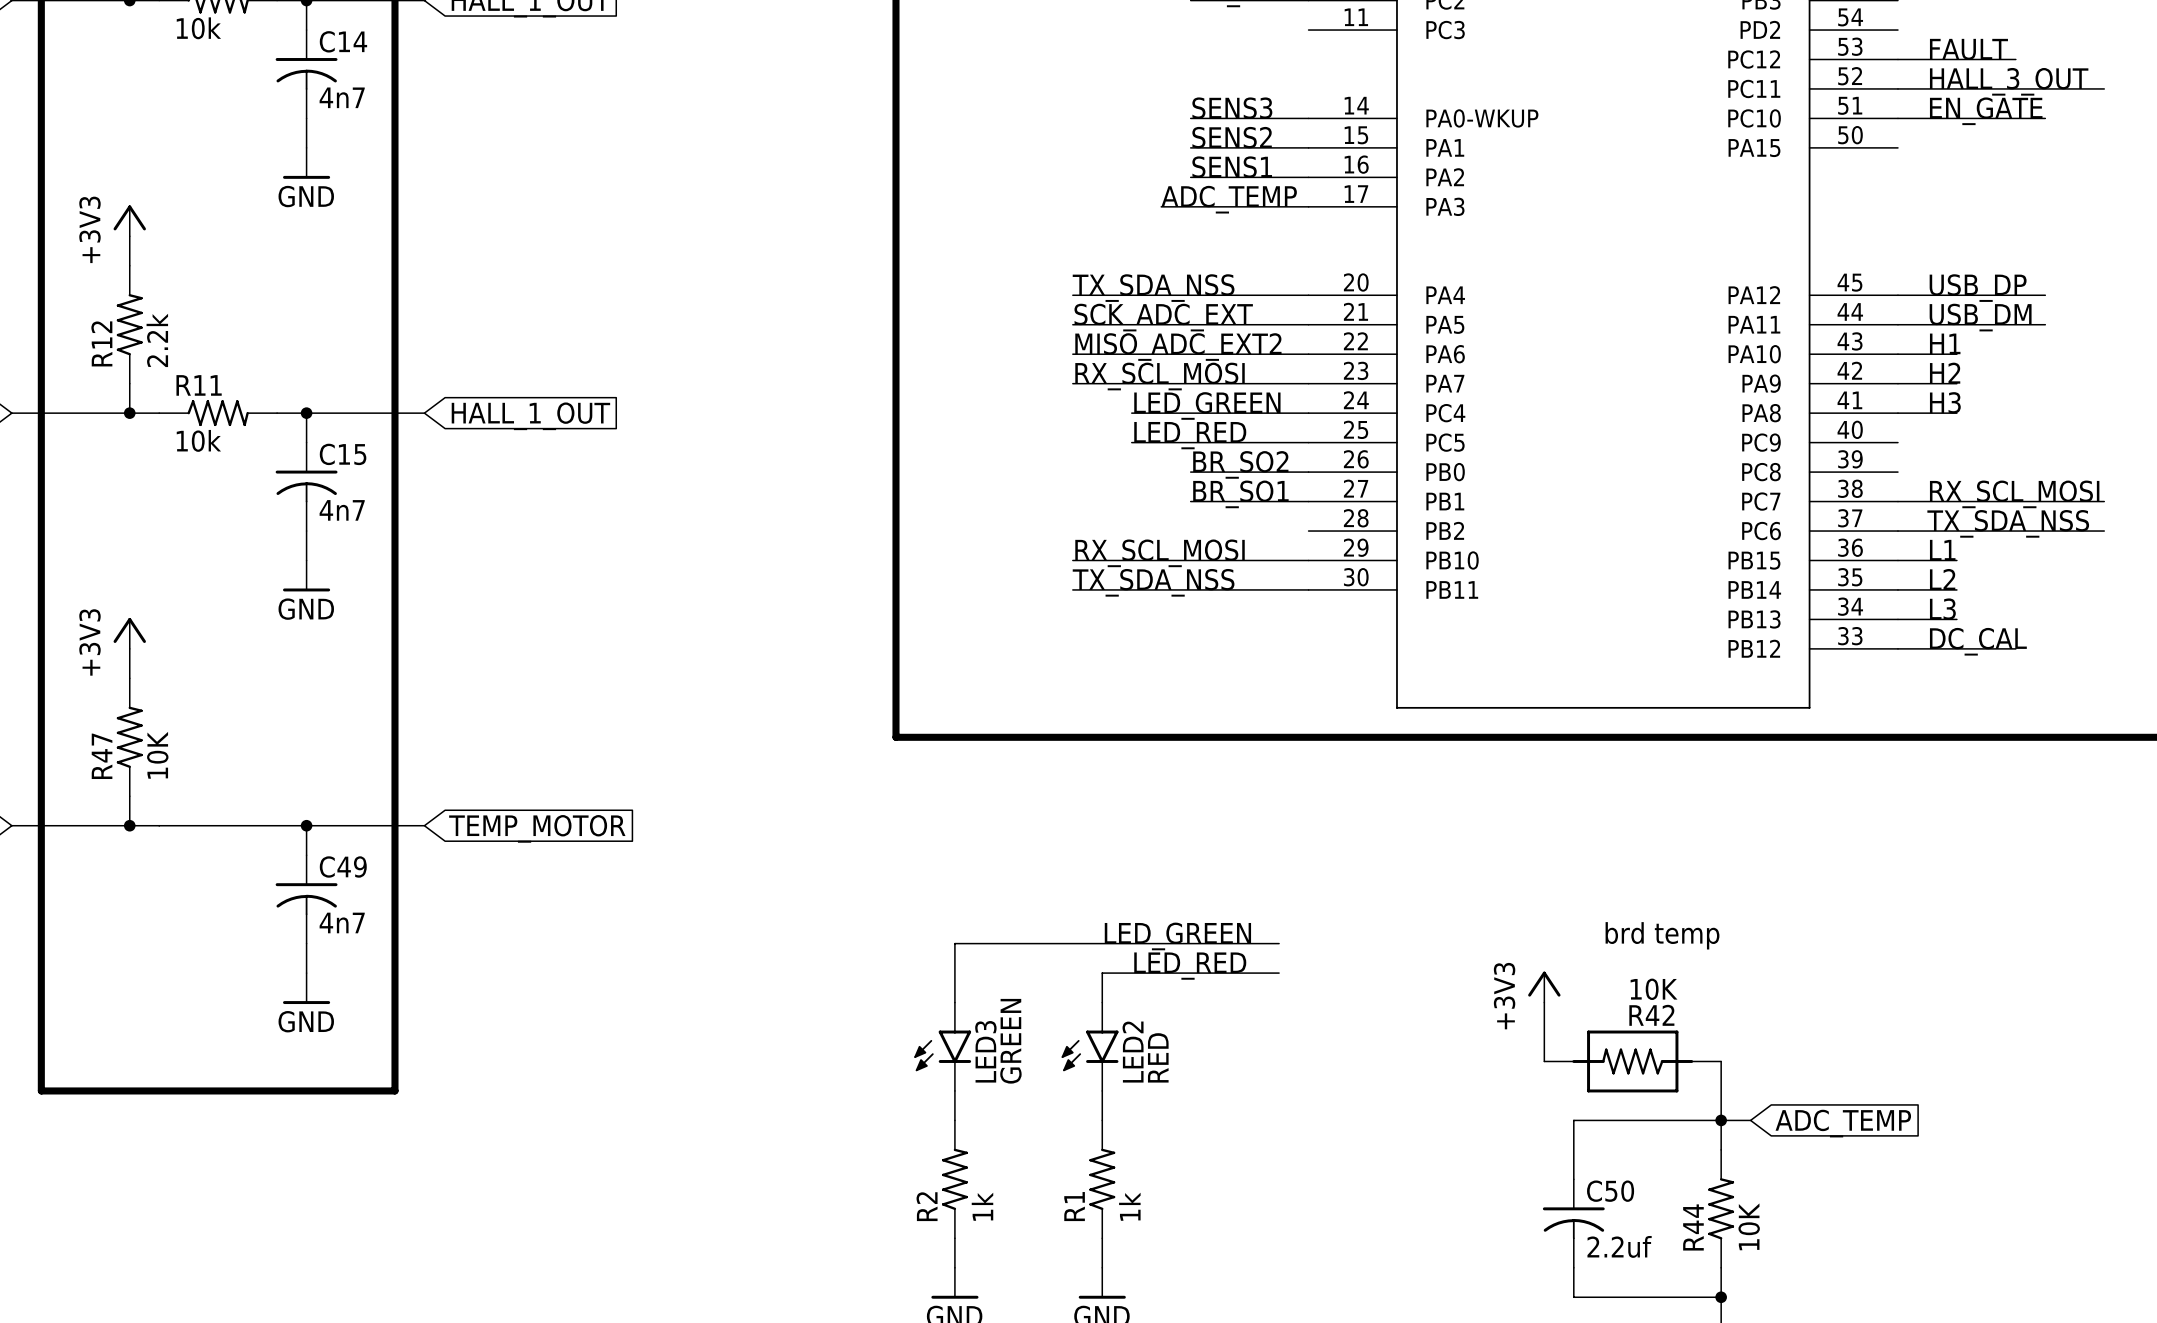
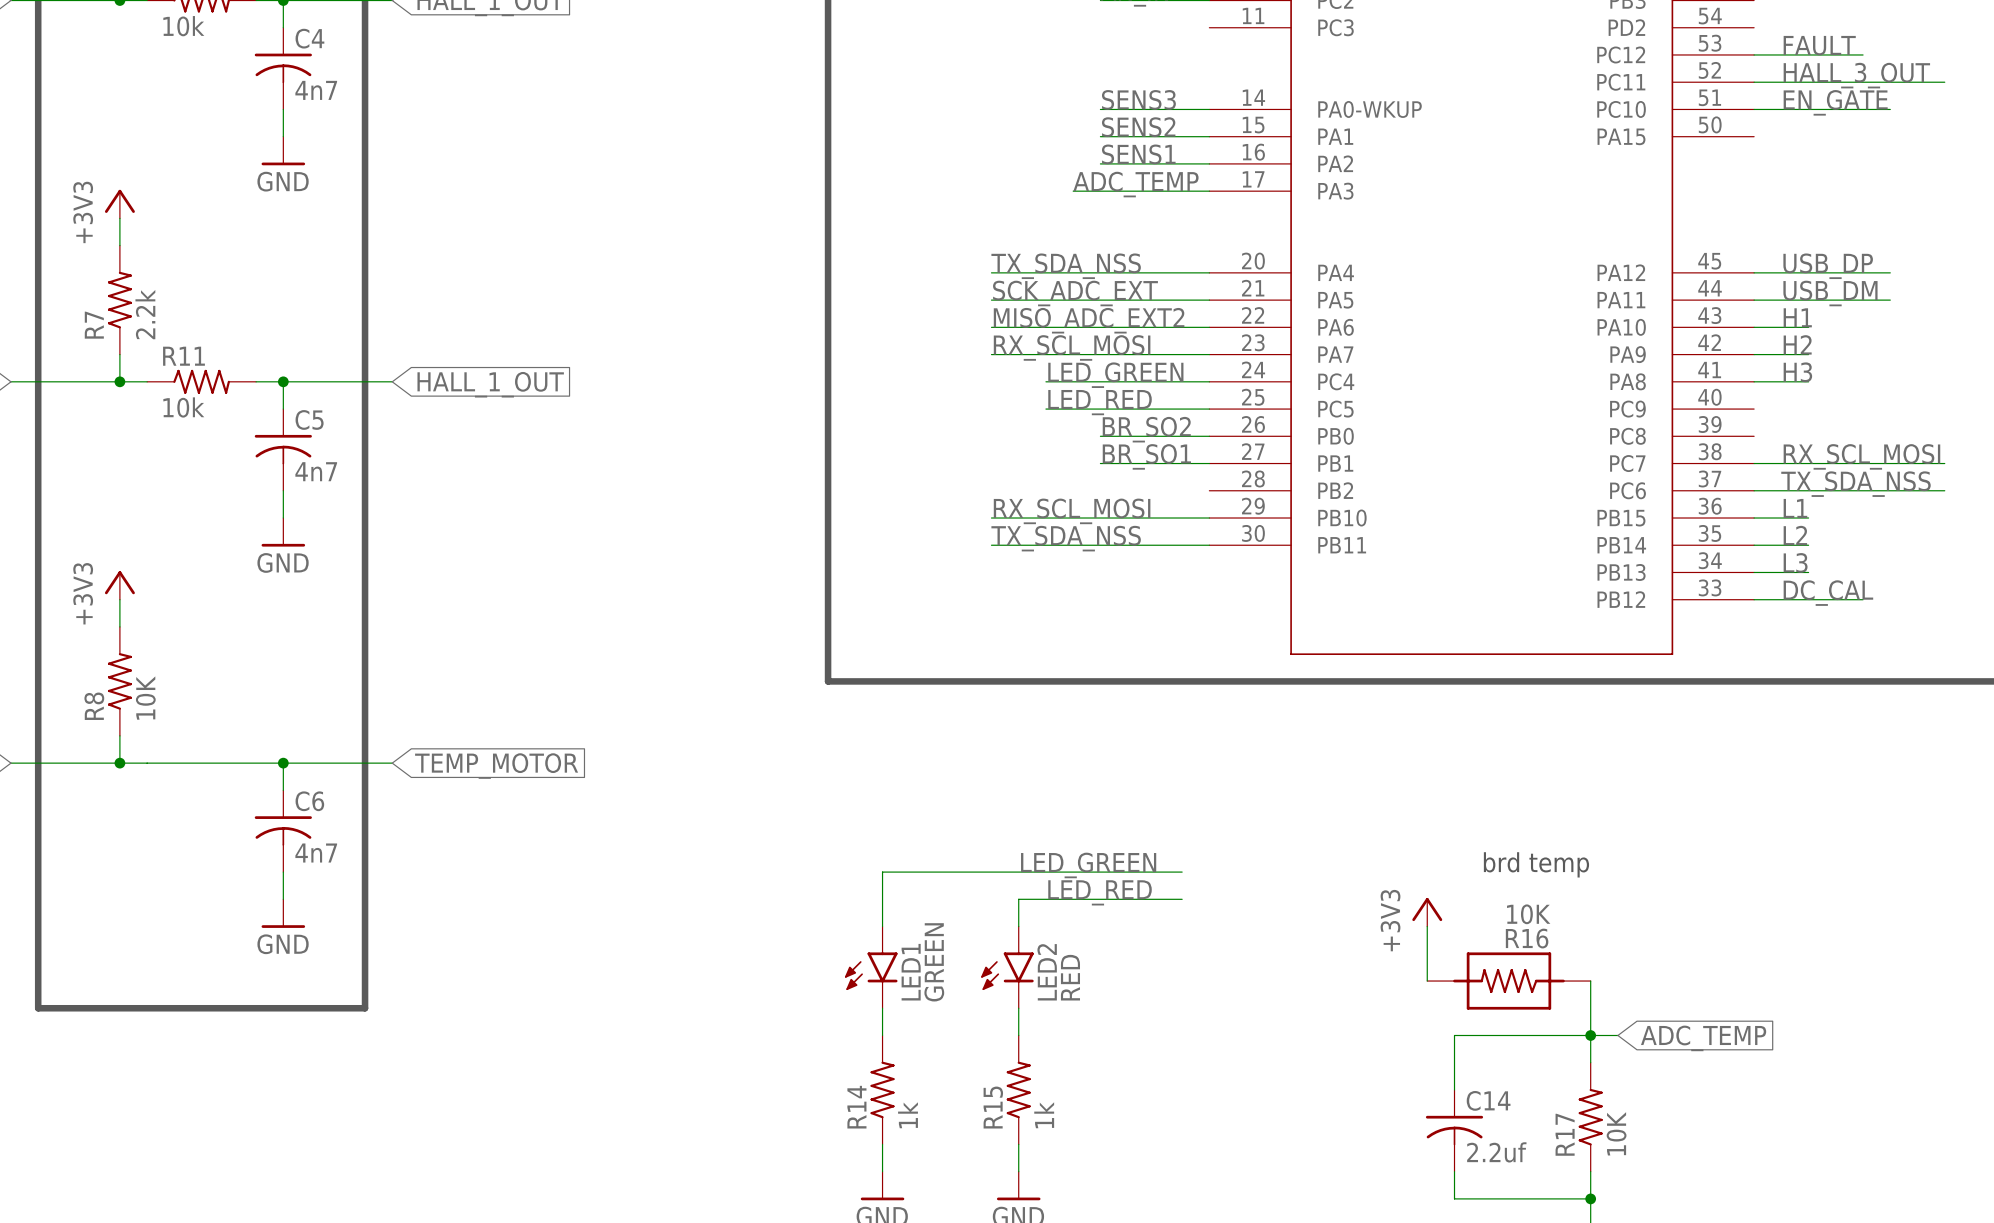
C14 name: C14 (343, 41) -> C4 (309, 38)
R12 name: R12 (101, 343) -> R7 (94, 325)
C15 name: C15 (343, 454) -> C5 (309, 419)
R47 name: R47 (102, 756) -> R8 (94, 706)
C49 name: C49 (343, 867) -> C6 (309, 801)
R42 name: R42 (1651, 1015) -> R16 (1527, 938)
LED3 name: LED3 (985, 1051) -> LED1 (911, 972)
C50 name: C50 (1610, 1191) -> C14 (1488, 1100)
R2 name: R2 (927, 1206) -> R14 (856, 1107)
R1 name: R1 (1074, 1206) -> R15 (993, 1107)
R44 name: R44 (1693, 1227) -> R17 (1565, 1134)

